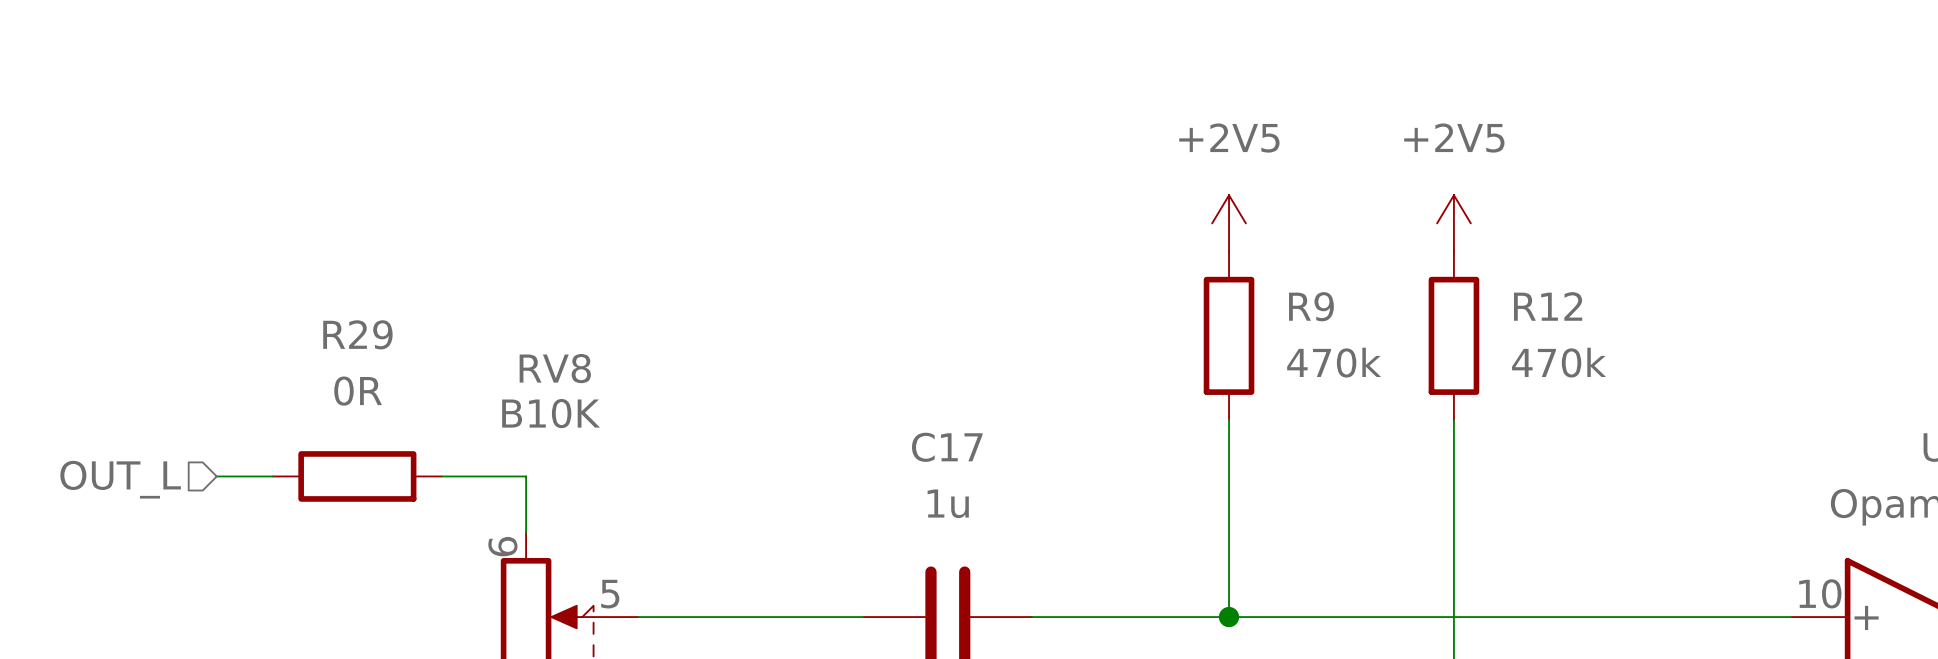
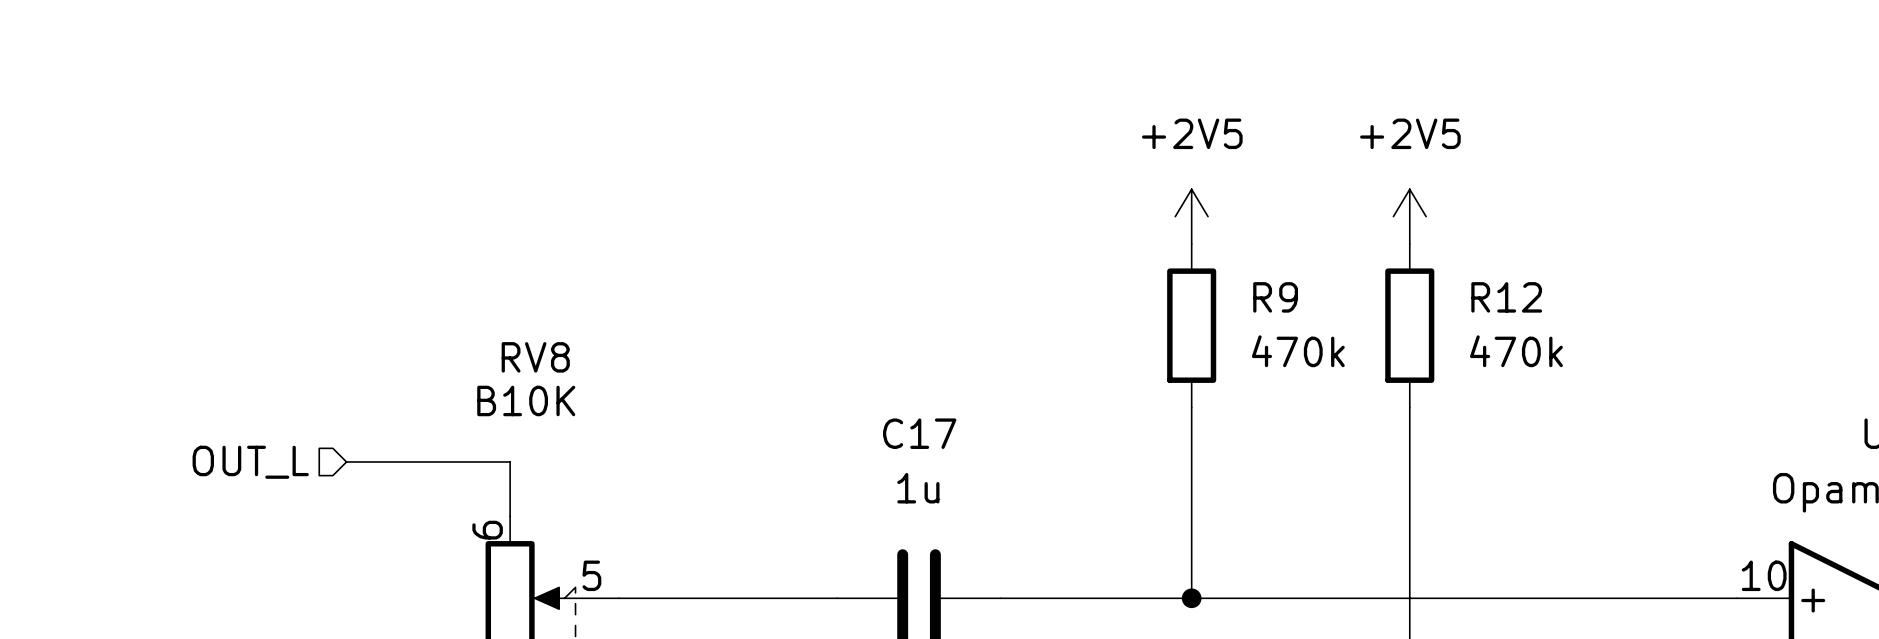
wire: (216, 476) (273, 476) -> none
wire: none -> (346, 461) (428, 461)
R29: 0R (357, 476) -> none
hierarchical label position: OUT_L (120, 479) -> OUT_L (250, 462)

